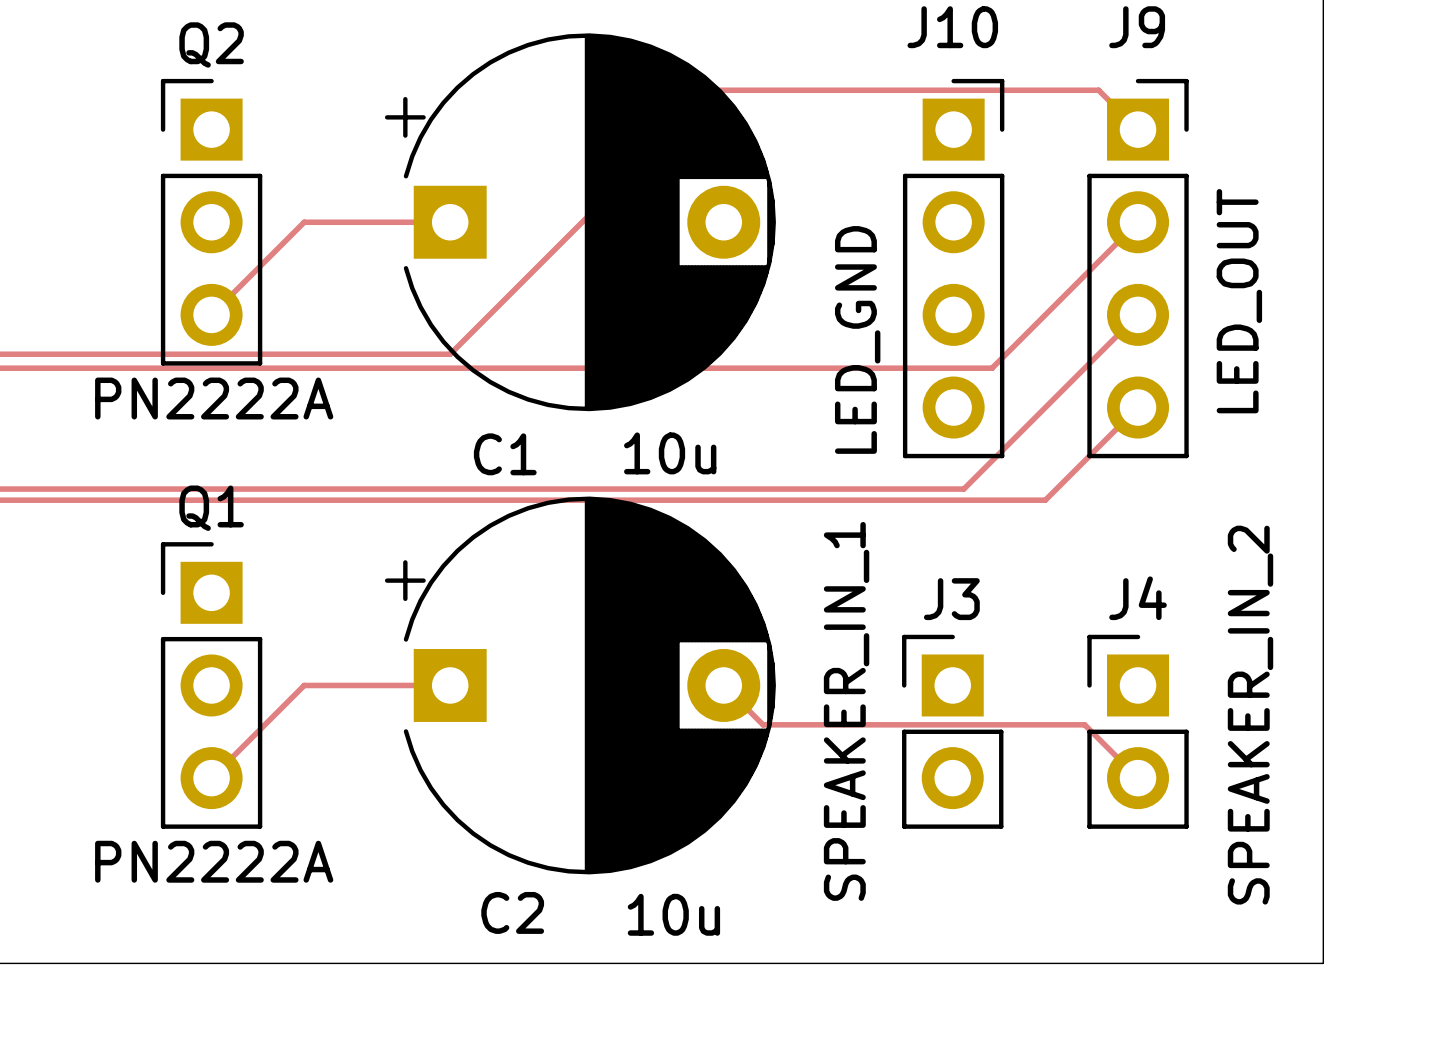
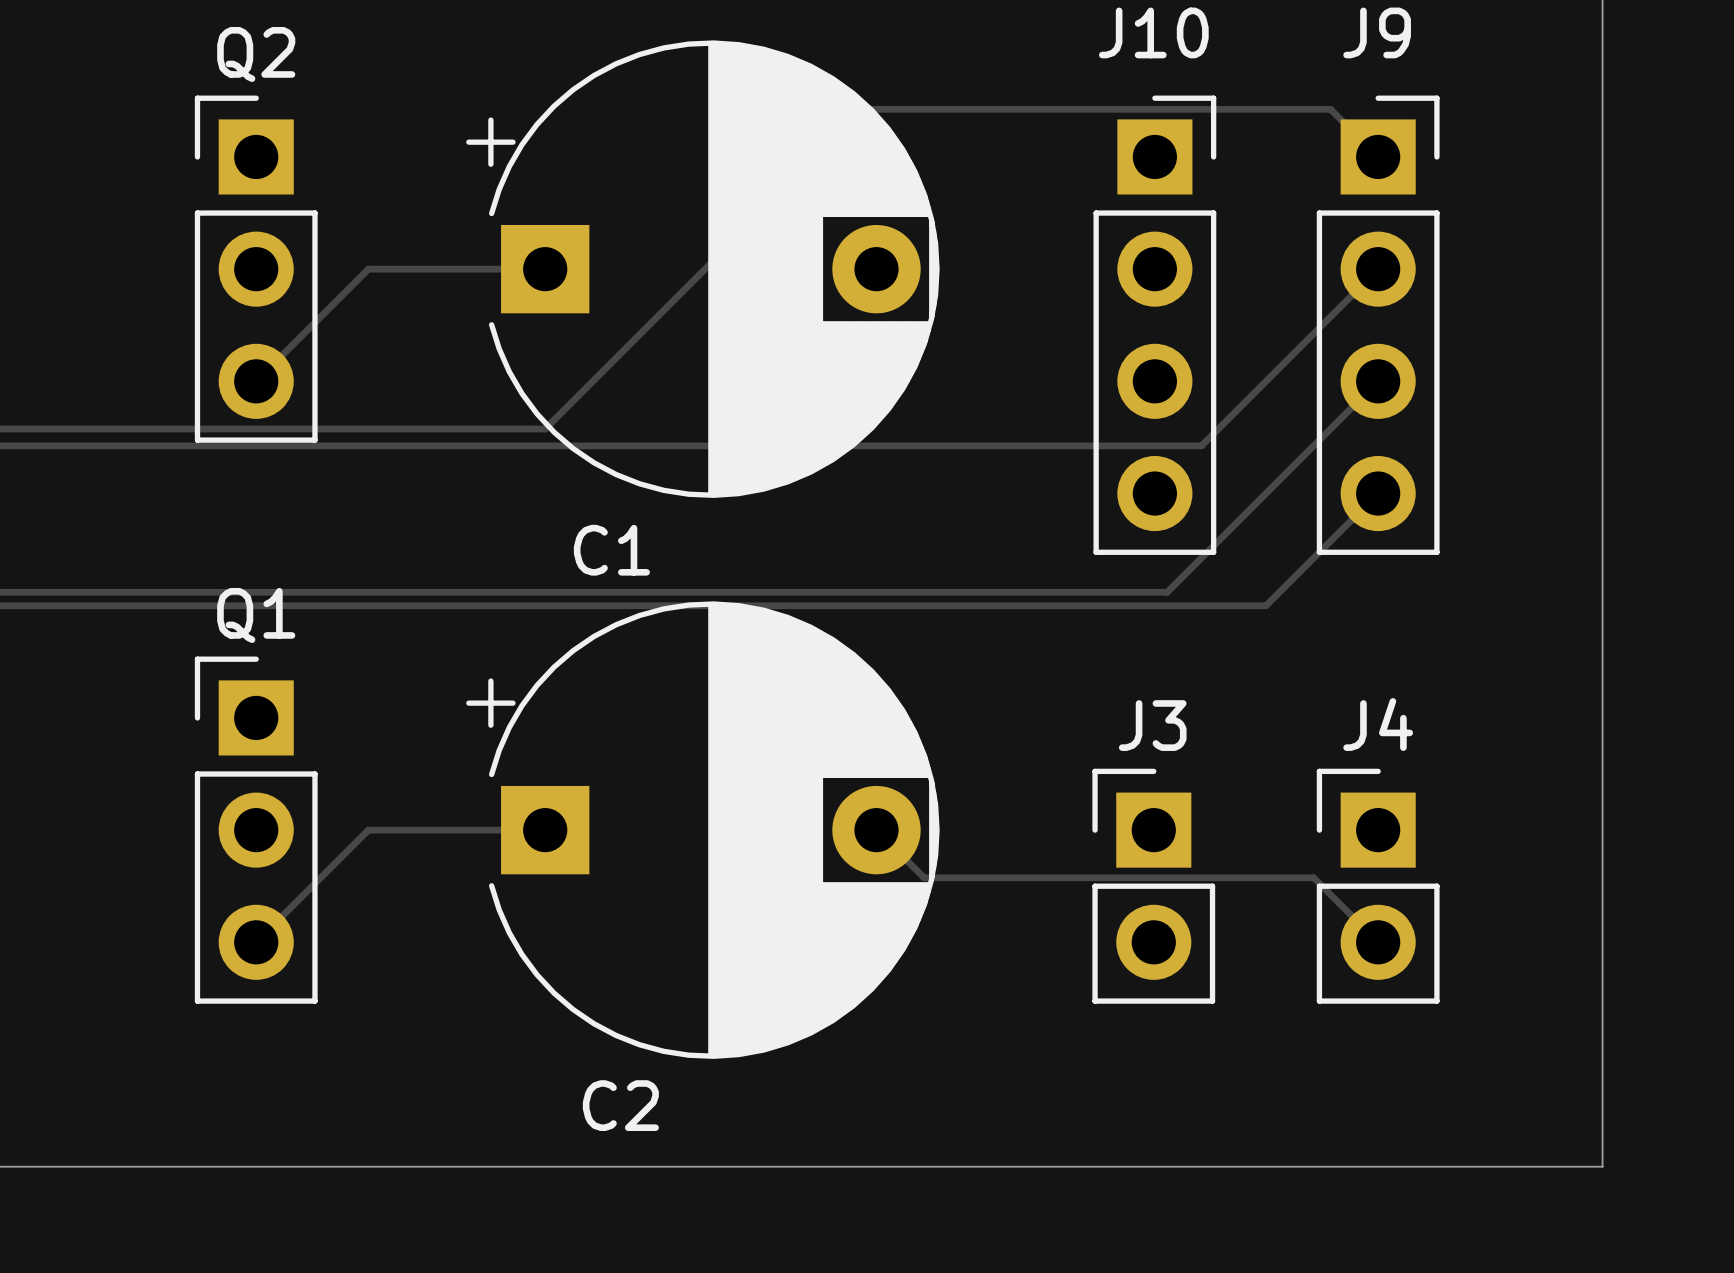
J9 value: LED_OUT (1239, 301) -> none
J10 value: LED_GND (857, 339) -> none
Q2 value: PN2222A (214, 398) -> none
C1 value: 10u (670, 453) -> none
J3 value: SPEAKER_IN_1 (846, 711) -> none
J4 value: SPEAKER_IN_2 (1250, 715) -> none
Q1 value: PN2222A (214, 861) -> none
C2 value: 10u (673, 914) -> none

